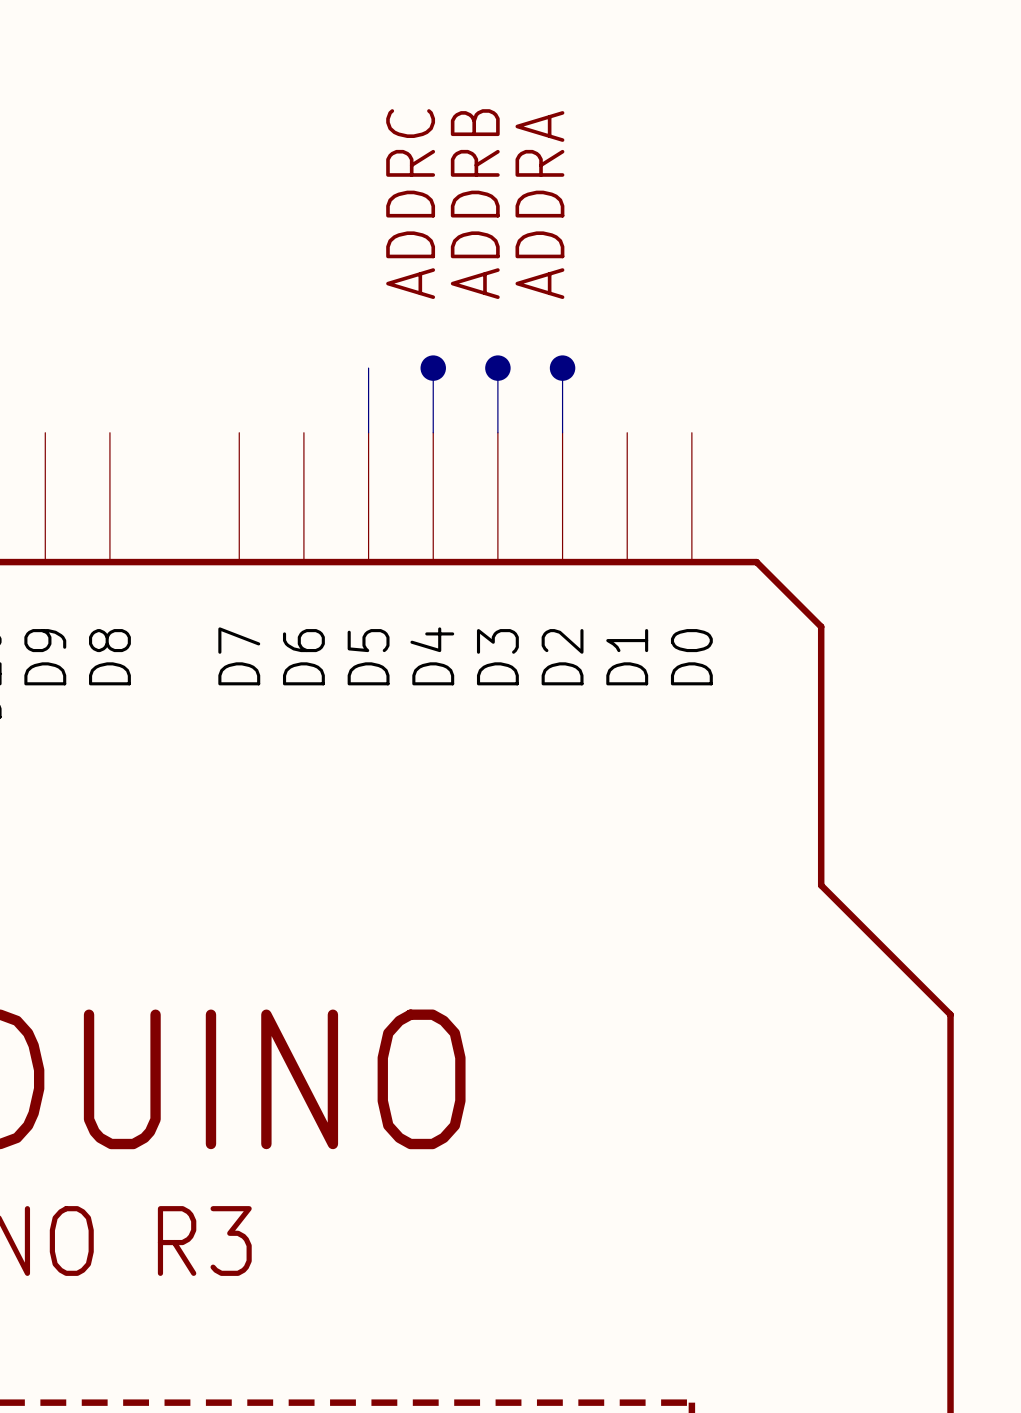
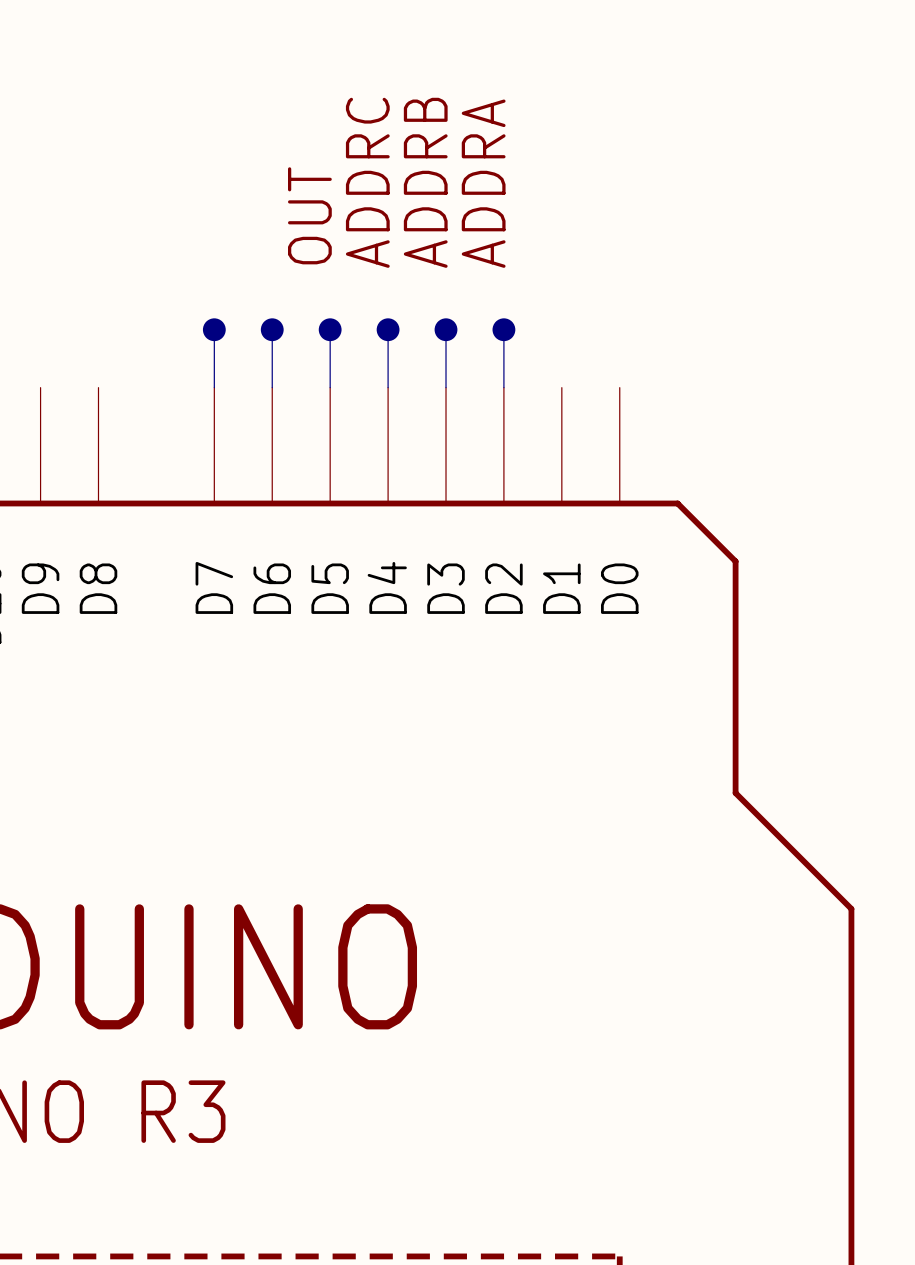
label: none -> OUT (309, 215)
wire: none -> (214, 329) (214, 387)
junction: none -> (214, 329)
wire: none -> (272, 329) (272, 387)
junction: none -> (272, 329)
junction: none -> (330, 329)

